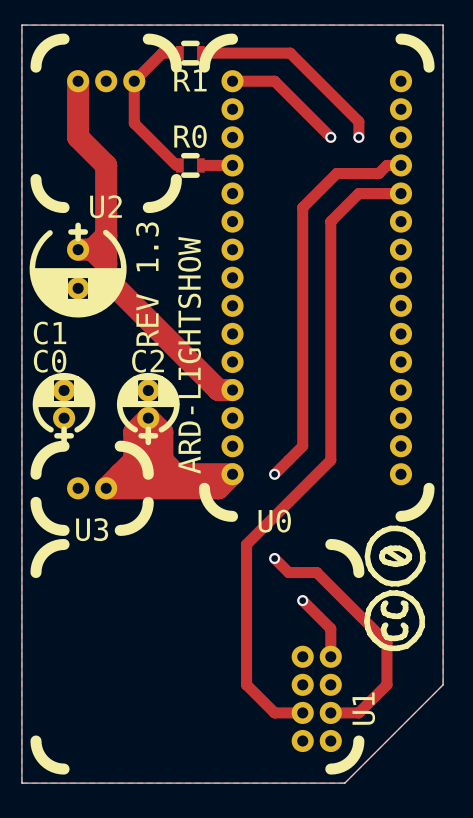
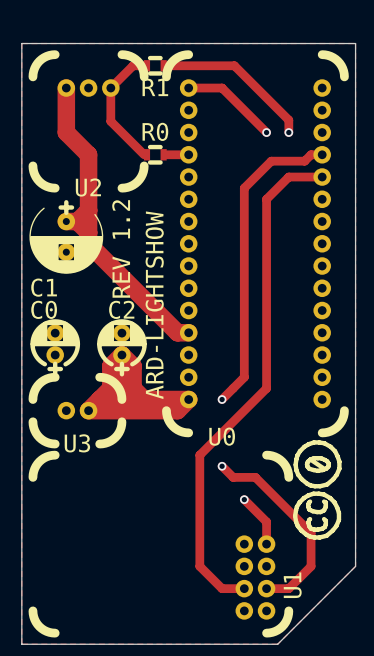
C1 footprint: [29, 222, 127, 318] -> [29, 200, 104, 274]
text: REV 1.3 (147, 284) -> REV 1.2 (121, 248)

